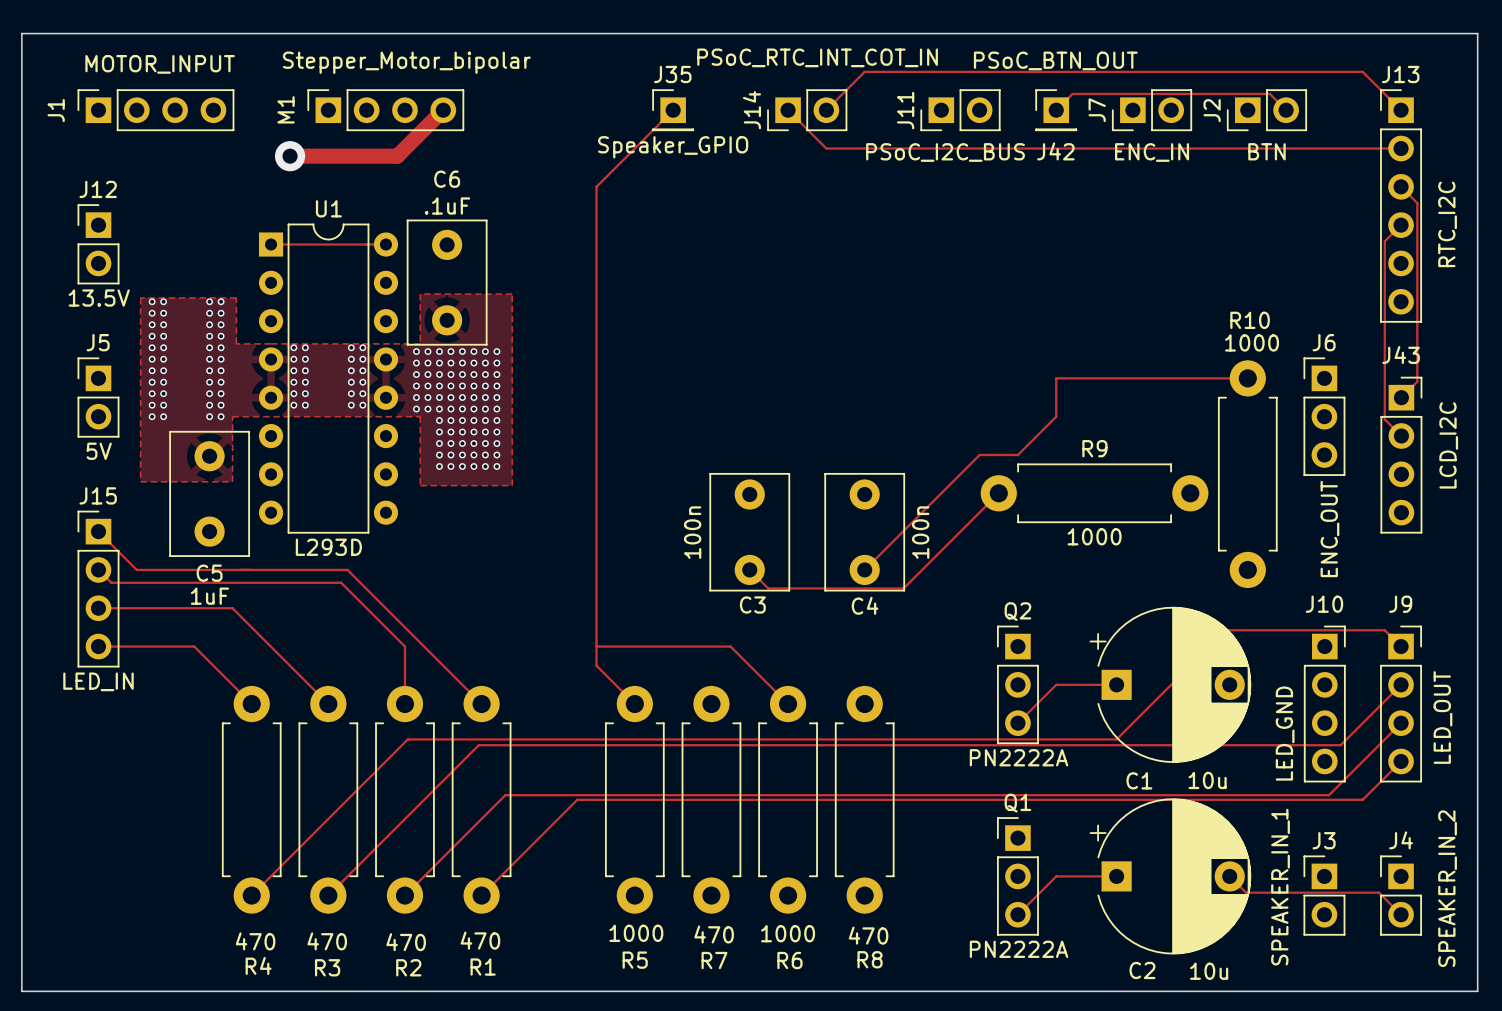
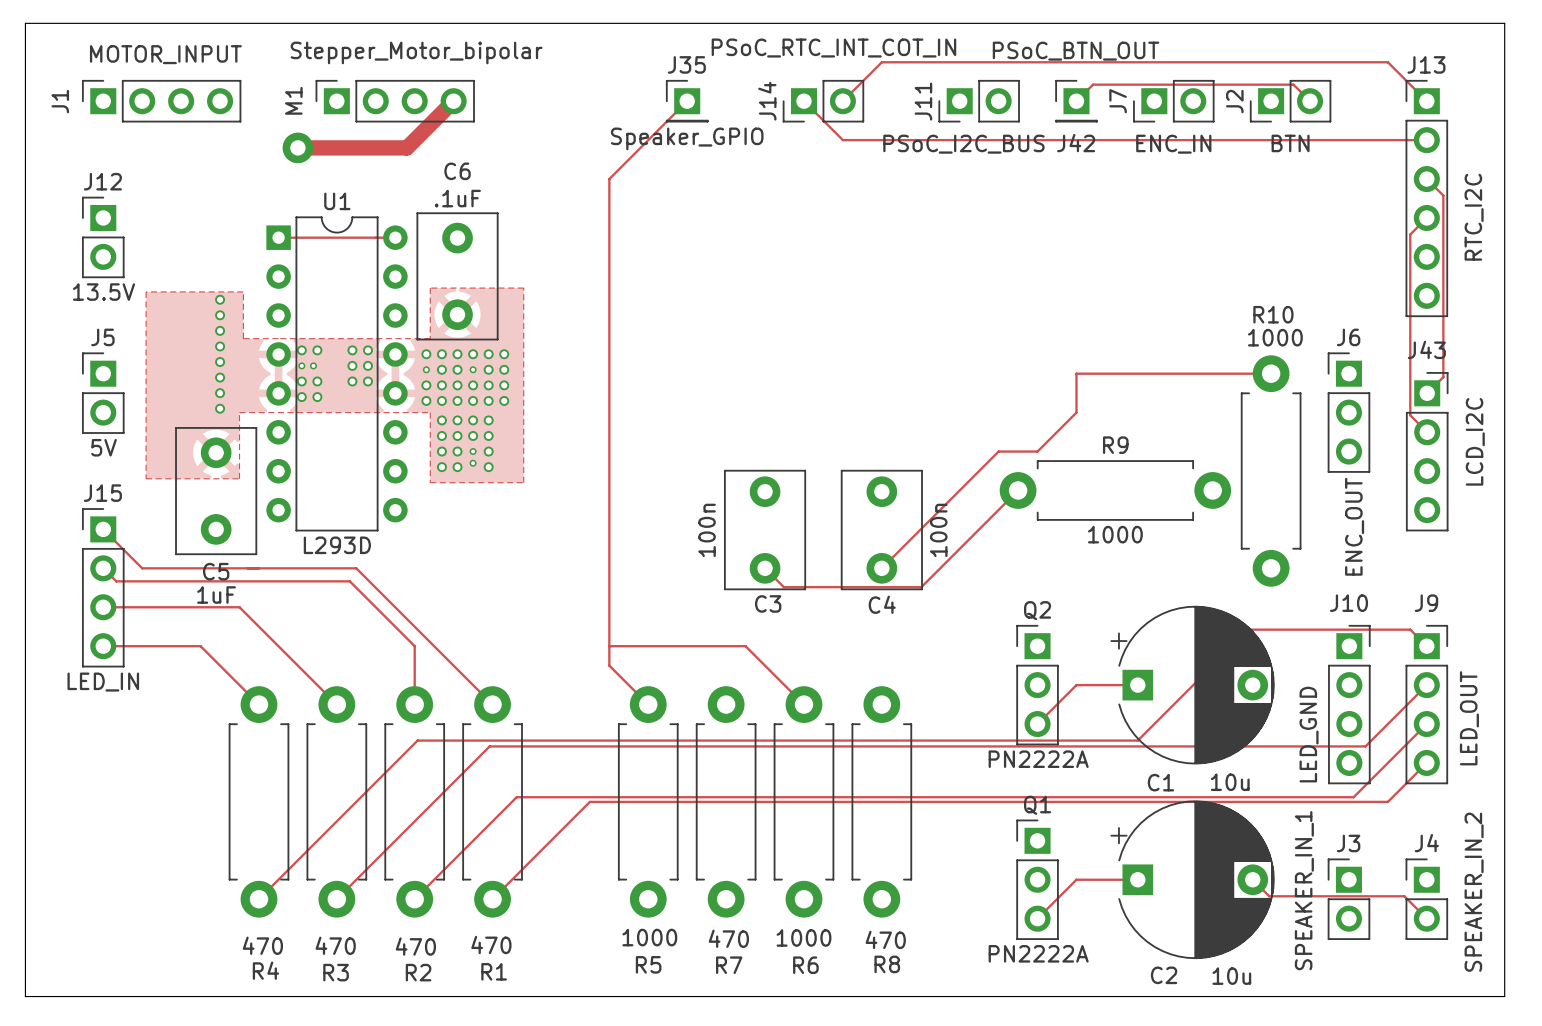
via: (152, 301) -> none
via: (163, 301) -> none
via: (209, 301) -> none
via: (221, 301) -> none
via: none -> (220, 299)
via: (152, 313) -> none
via: (163, 313) -> none
via: (209, 313) -> none
via: (221, 313) -> none
via: none -> (220, 315)
via: (152, 324) -> none
via: (163, 324) -> none
via: (209, 324) -> none
via: (221, 324) -> none
via: (152, 336) -> none
via: (163, 336) -> none
via: (209, 336) -> none
via: none -> (220, 330)
via: (221, 336) -> none
via: (152, 347) -> none
via: (163, 347) -> none
via: (209, 347) -> none
via: (221, 347) -> none
via: (293, 347) -> none
via: (305, 347) -> none
via: (351, 347) -> none
via: (362, 347) -> none
via: none -> (220, 346)
via: (416, 351) -> none
via: (427, 351) -> none
via: (439, 351) -> none
via: (450, 351) -> none
via: (462, 351) -> none
via: (473, 351) -> none
via: (485, 351) -> none
via: (496, 351) -> none
via: none -> (301, 350)
via: none -> (317, 350)
via: none -> (352, 350)
via: none -> (367, 350)
via: (152, 359) -> none
via: (163, 359) -> none
via: (209, 359) -> none
via: (221, 359) -> none
via: (293, 359) -> none
via: (305, 359) -> none
via: (351, 359) -> none
via: (362, 359) -> none
via: none -> (426, 354)
via: none -> (441, 354)
via: none -> (457, 354)
via: none -> (473, 354)
via: none -> (488, 354)
via: none -> (504, 354)
via: (416, 363) -> none
via: (427, 363) -> none
via: (439, 363) -> none
via: (450, 363) -> none
via: (462, 363) -> none
via: (473, 363) -> none
via: (485, 363) -> none
via: (496, 363) -> none
via: none -> (220, 362)
via: (152, 370) -> none
via: (163, 370) -> none
via: (209, 370) -> none
via: (221, 370) -> none
via: none -> (352, 365)
via: (351, 370) -> none
via: none -> (367, 365)
via: (362, 370) -> none
via: (427, 374) -> none
via: none -> (441, 369)
via: (439, 374) -> none
via: none -> (457, 369)
via: (450, 374) -> none
via: (473, 374) -> none
via: none -> (488, 369)
via: (485, 374) -> none
via: none -> (504, 369)
via: (496, 374) -> none
via: (152, 382) -> none
via: (163, 382) -> none
via: (209, 382) -> none
via: none -> (220, 377)
via: (221, 382) -> none
via: (293, 382) -> none
via: (305, 382) -> none
via: (351, 382) -> none
via: (362, 382) -> none
via: (462, 385) -> none
via: none -> (301, 381)
via: none -> (317, 381)
via: none -> (352, 381)
via: none -> (367, 381)
via: (416, 386) -> none
via: (427, 386) -> none
via: (439, 386) -> none
via: (450, 386) -> none
via: (473, 386) -> none
via: (485, 386) -> none
via: (496, 386) -> none
via: none -> (426, 385)
via: none -> (441, 385)
via: none -> (457, 385)
via: none -> (473, 385)
via: none -> (488, 385)
via: none -> (504, 385)
via: (152, 393) -> none
via: (163, 393) -> none
via: (209, 393) -> none
via: (221, 393) -> none
via: (293, 393) -> none
via: (305, 393) -> none
via: (351, 393) -> none
via: (362, 393) -> none
via: none -> (220, 393)
via: (416, 397) -> none
via: (427, 397) -> none
via: (439, 397) -> none
via: (450, 397) -> none
via: (462, 397) -> none
via: (473, 397) -> none
via: (485, 397) -> none
via: (496, 397) -> none
via: none -> (301, 397)
via: none -> (317, 397)
via: (152, 405) -> none
via: (163, 405) -> none
via: (209, 405) -> none
via: (221, 405) -> none
via: (293, 405) -> none
via: (305, 405) -> none
via: (351, 405) -> none
via: (362, 405) -> none
via: none -> (426, 400)
via: none -> (441, 400)
via: none -> (457, 400)
via: none -> (473, 400)
via: none -> (488, 400)
via: none -> (504, 400)
via: (462, 408) -> none
via: (416, 409) -> none
via: (427, 409) -> none
via: (439, 409) -> none
via: (450, 409) -> none
via: (473, 409) -> none
via: (485, 409) -> none
via: (496, 409) -> none
via: none -> (220, 408)
via: (152, 416) -> none
via: (163, 416) -> none
via: (209, 416) -> none
via: (221, 416) -> none
via: (439, 420) -> none
via: (450, 420) -> none
via: (462, 420) -> none
via: (473, 420) -> none
via: (485, 420) -> none
via: (496, 420) -> none
via: none -> (441, 420)
via: none -> (457, 420)
via: none -> (473, 420)
via: none -> (488, 420)
via: (439, 432) -> none
via: (450, 432) -> none
via: (462, 432) -> none
via: (473, 432) -> none
via: (485, 432) -> none
via: (496, 432) -> none
via: none -> (441, 435)
via: none -> (457, 435)
via: none -> (473, 435)
via: none -> (488, 435)
via: (439, 443) -> none
via: (450, 443) -> none
via: (462, 443) -> none
via: (473, 443) -> none
via: (485, 443) -> none
via: (496, 443) -> none
via: none -> (441, 451)
via: (439, 455) -> none
via: none -> (457, 451)
via: (450, 455) -> none
via: (473, 455) -> none
via: none -> (488, 451)
via: (485, 455) -> none
via: (496, 455) -> none
via: (439, 466) -> none
via: (450, 466) -> none
via: (473, 466) -> none
via: (485, 466) -> none
via: (496, 466) -> none
via: none -> (441, 467)
via: none -> (457, 467)
via: none -> (488, 467)

